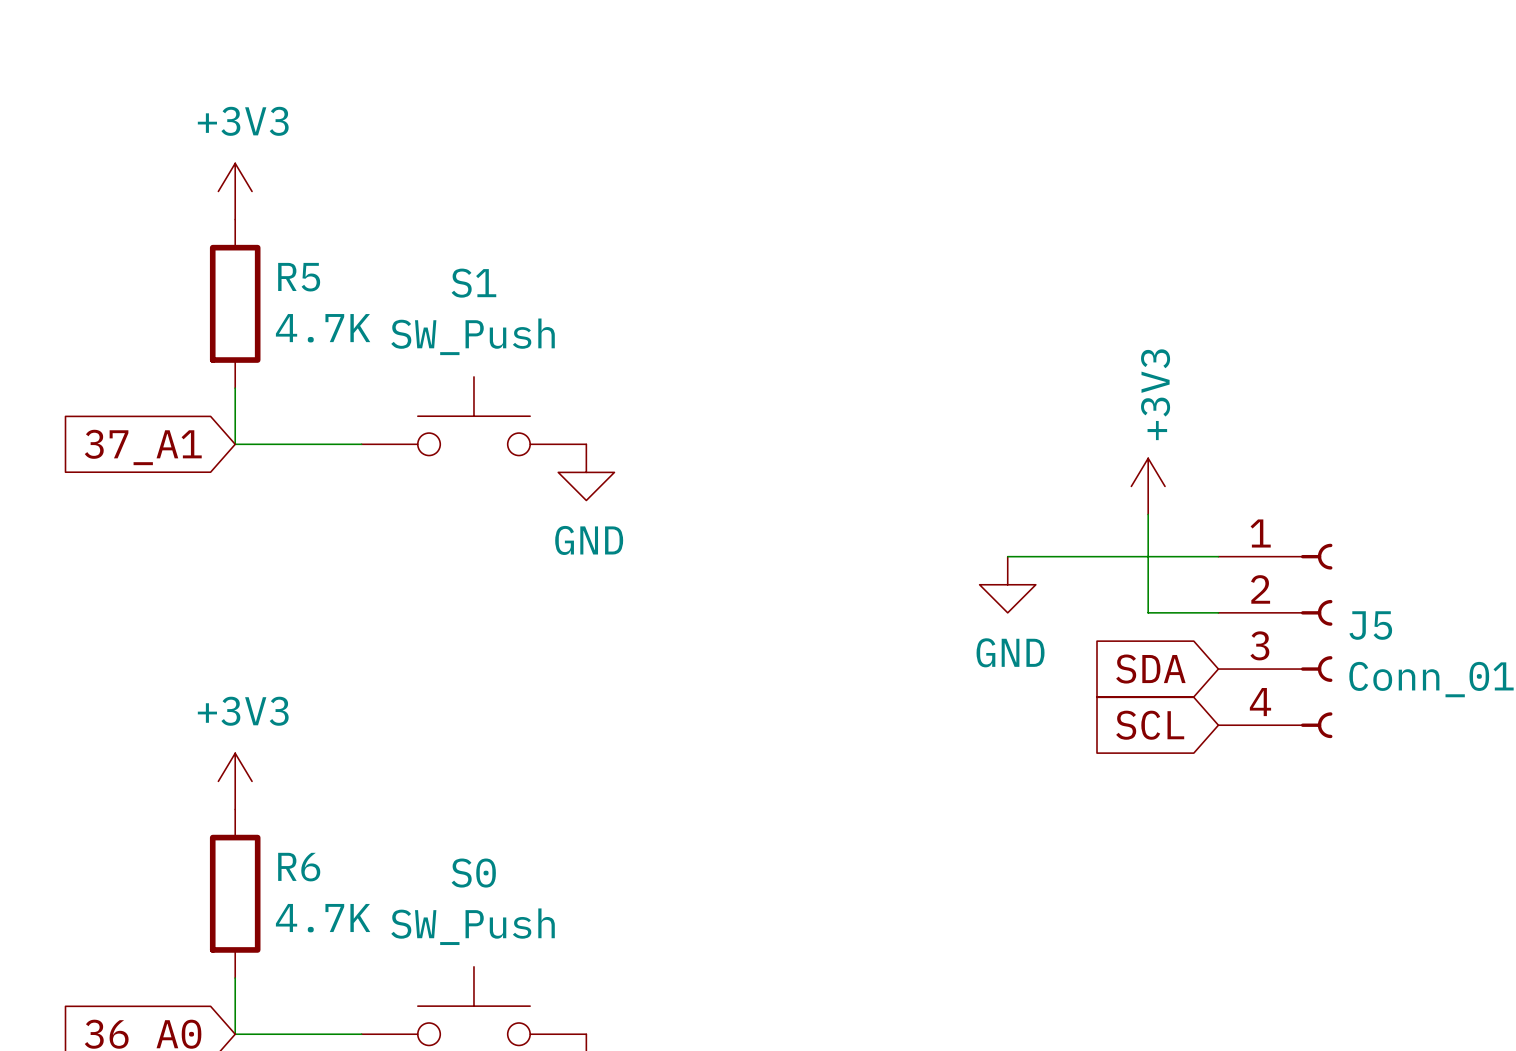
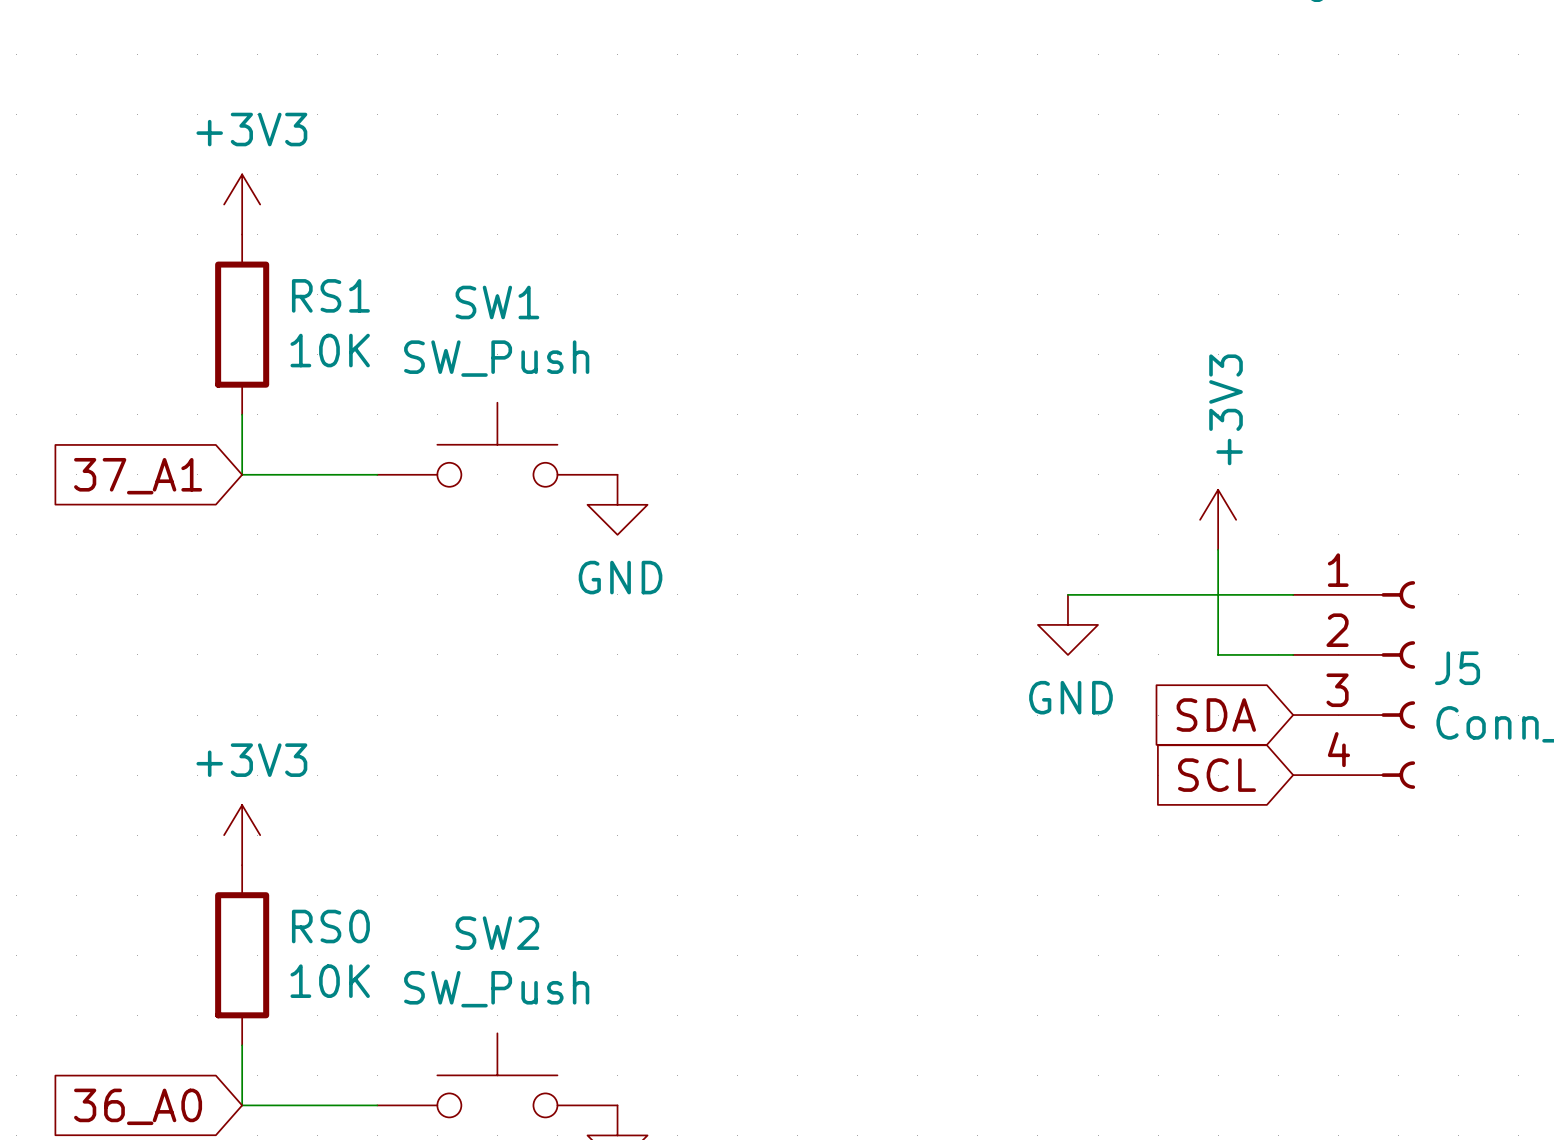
R5 name: R5 (299, 277) -> RS1 (330, 295)
S1 name: S1 (473, 283) -> SW1 (497, 302)
R5 value: 4.7K (323, 328) -> 10K (330, 350)
R6 name: R6 (299, 867) -> RS0 (330, 926)
S0 name: S0 (473, 873) -> SW2 (497, 933)
R6 value: 4.7K (323, 918) -> 10K (330, 981)

